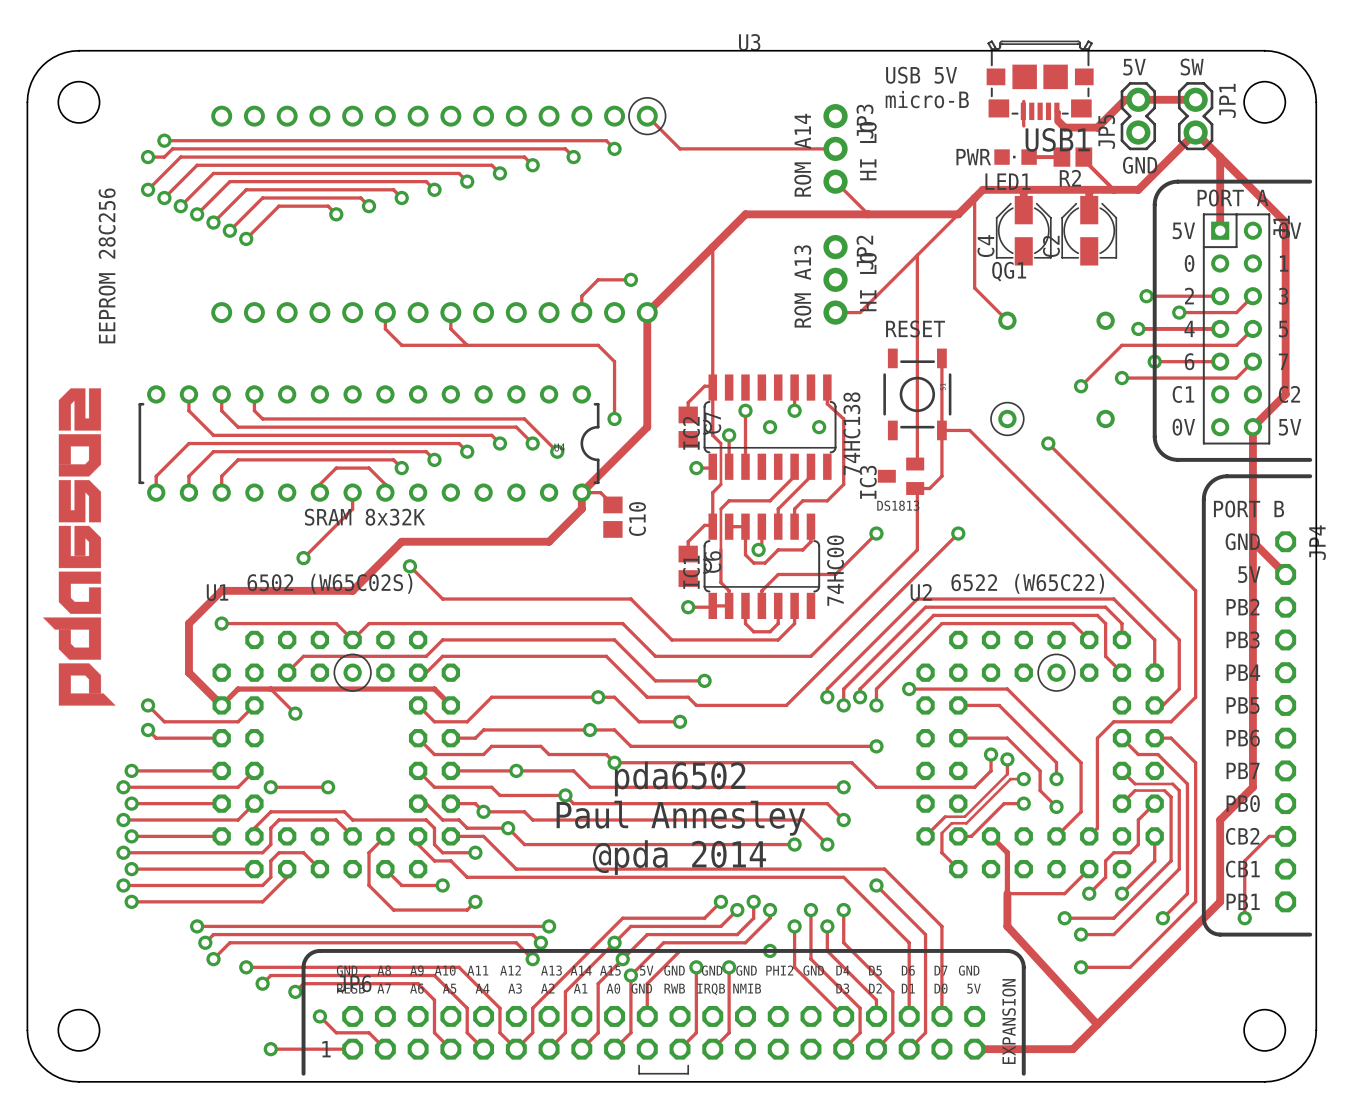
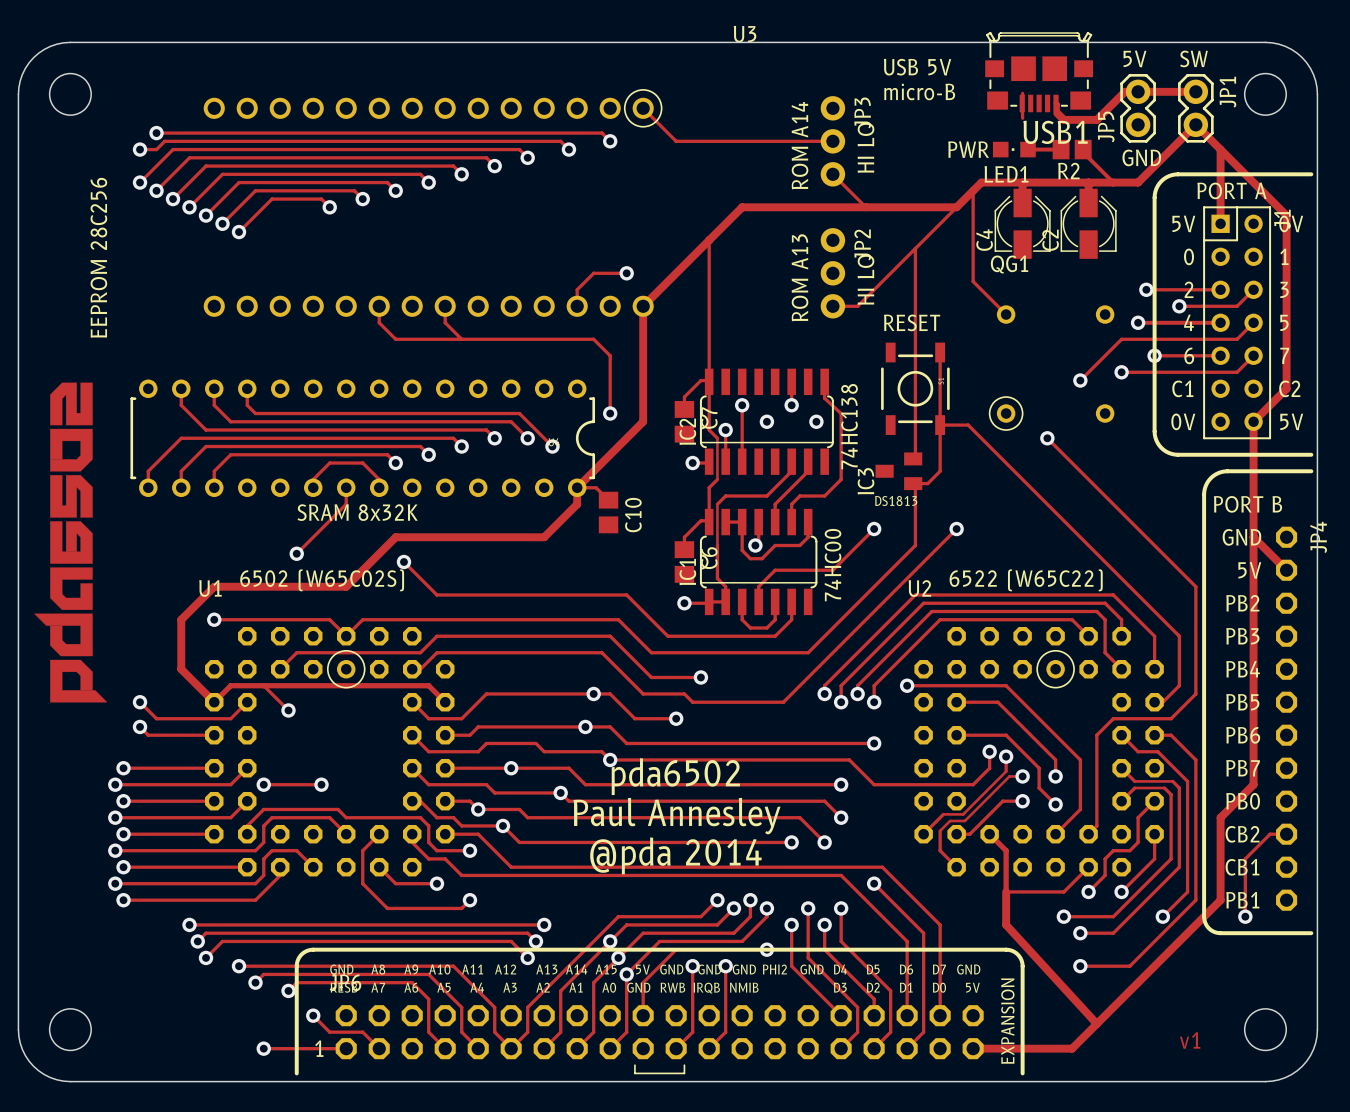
text: none -> v1 (1190, 1040)

